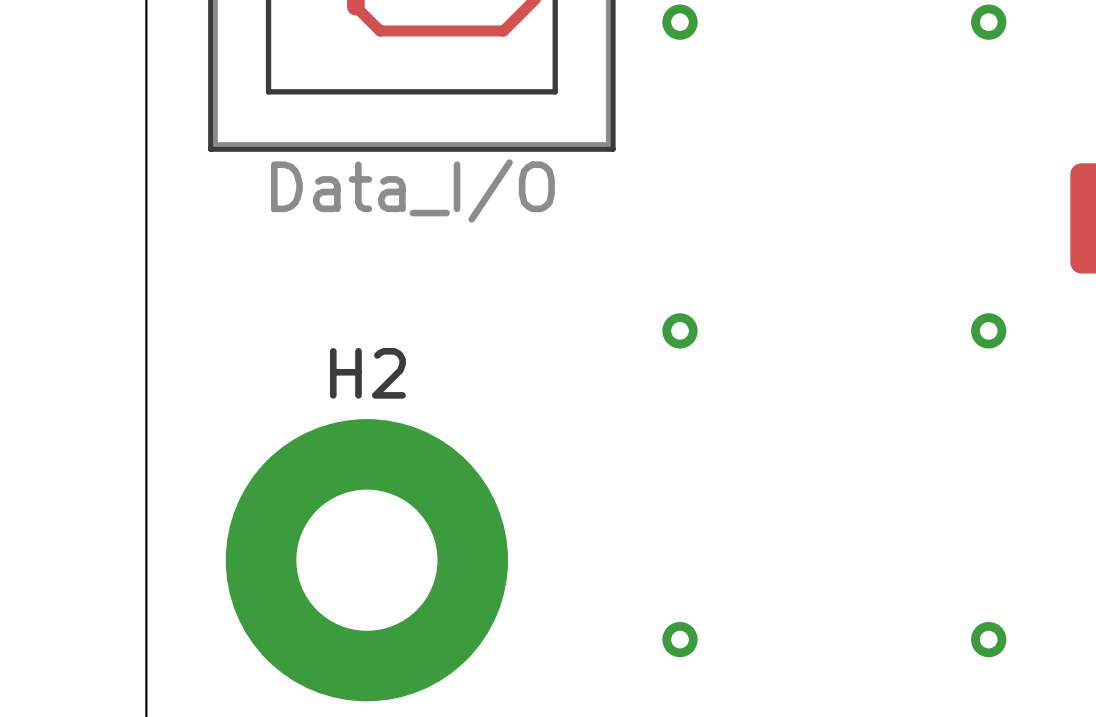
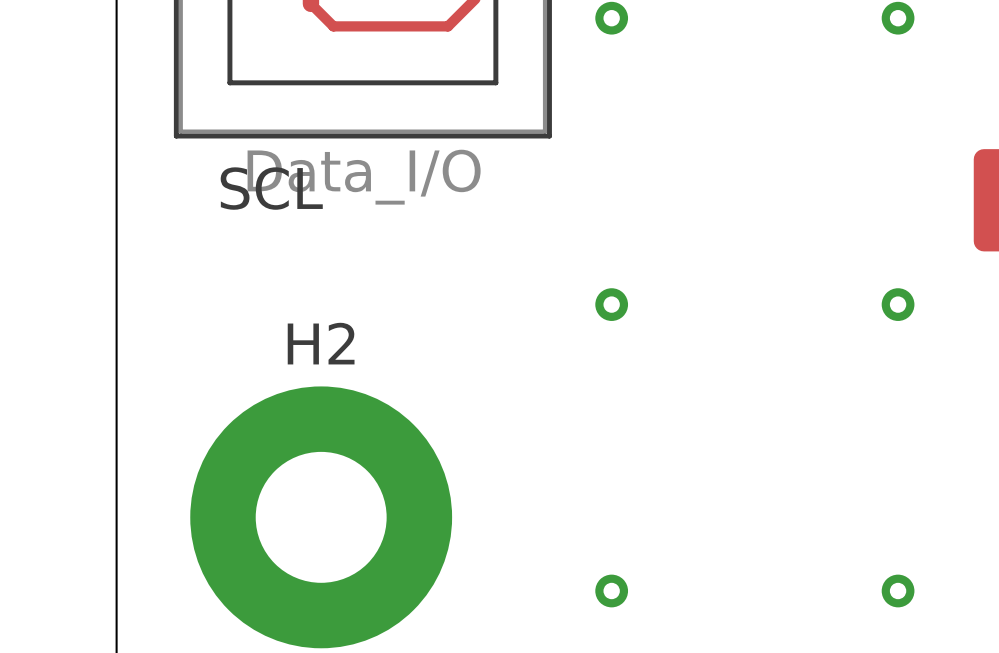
text: none -> SCL (271, 188)

